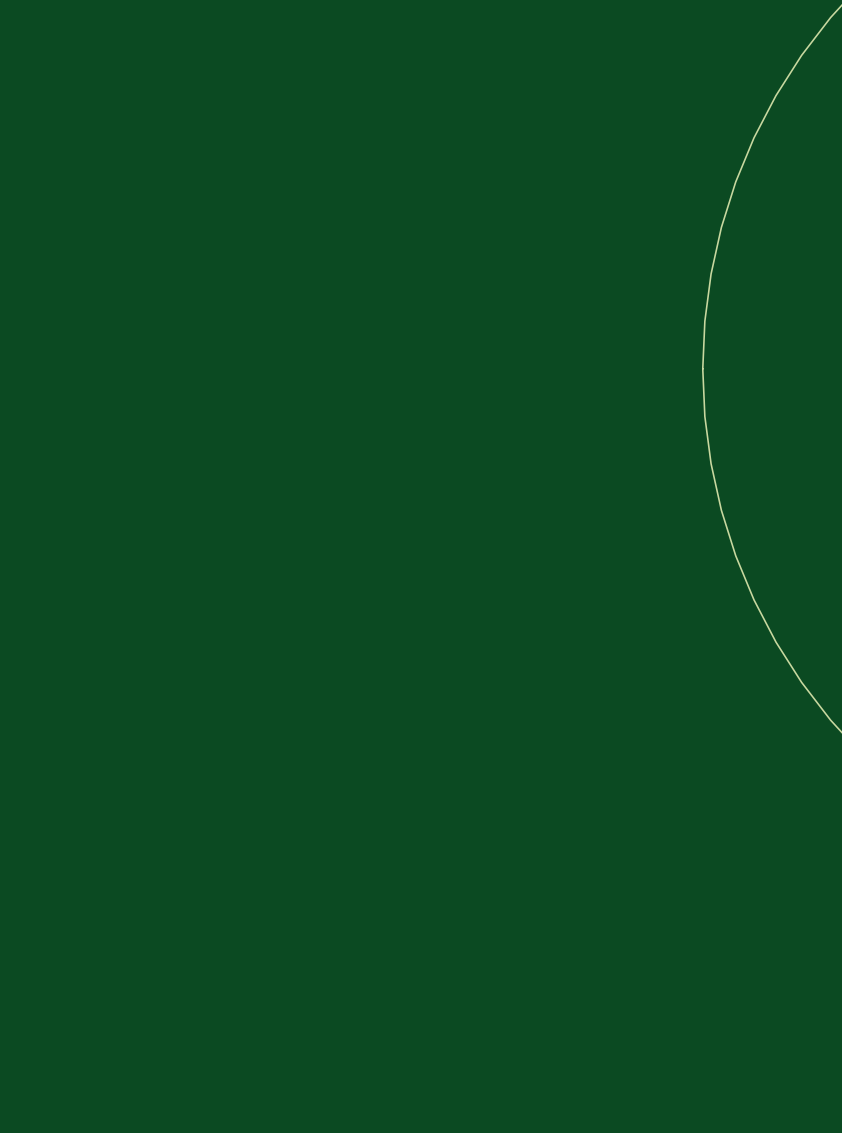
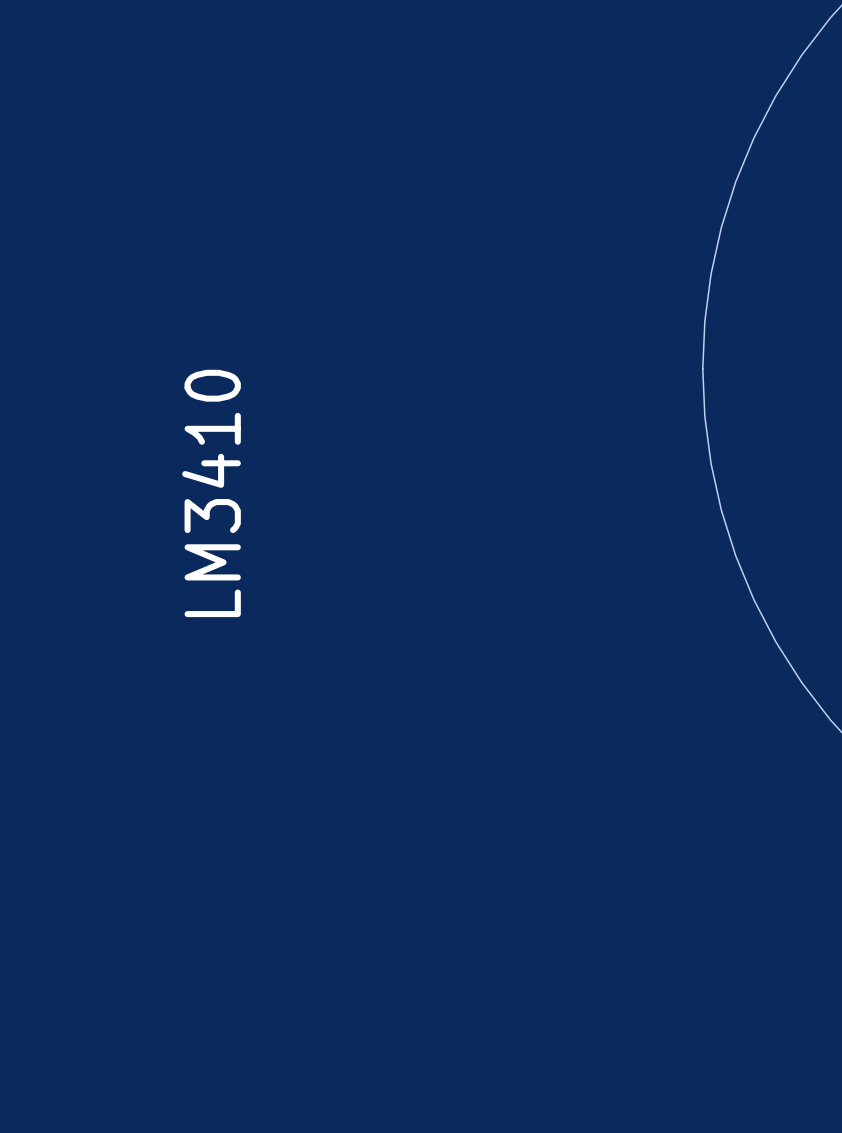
text: none -> LM3410 (211, 493)

